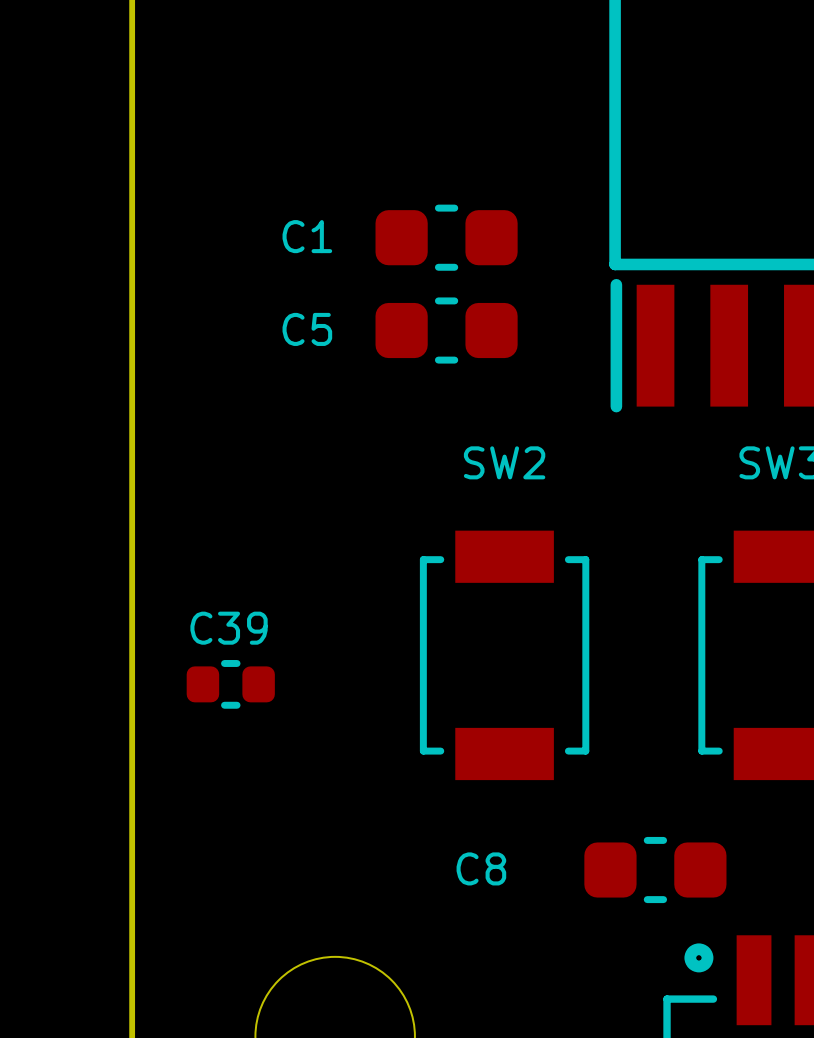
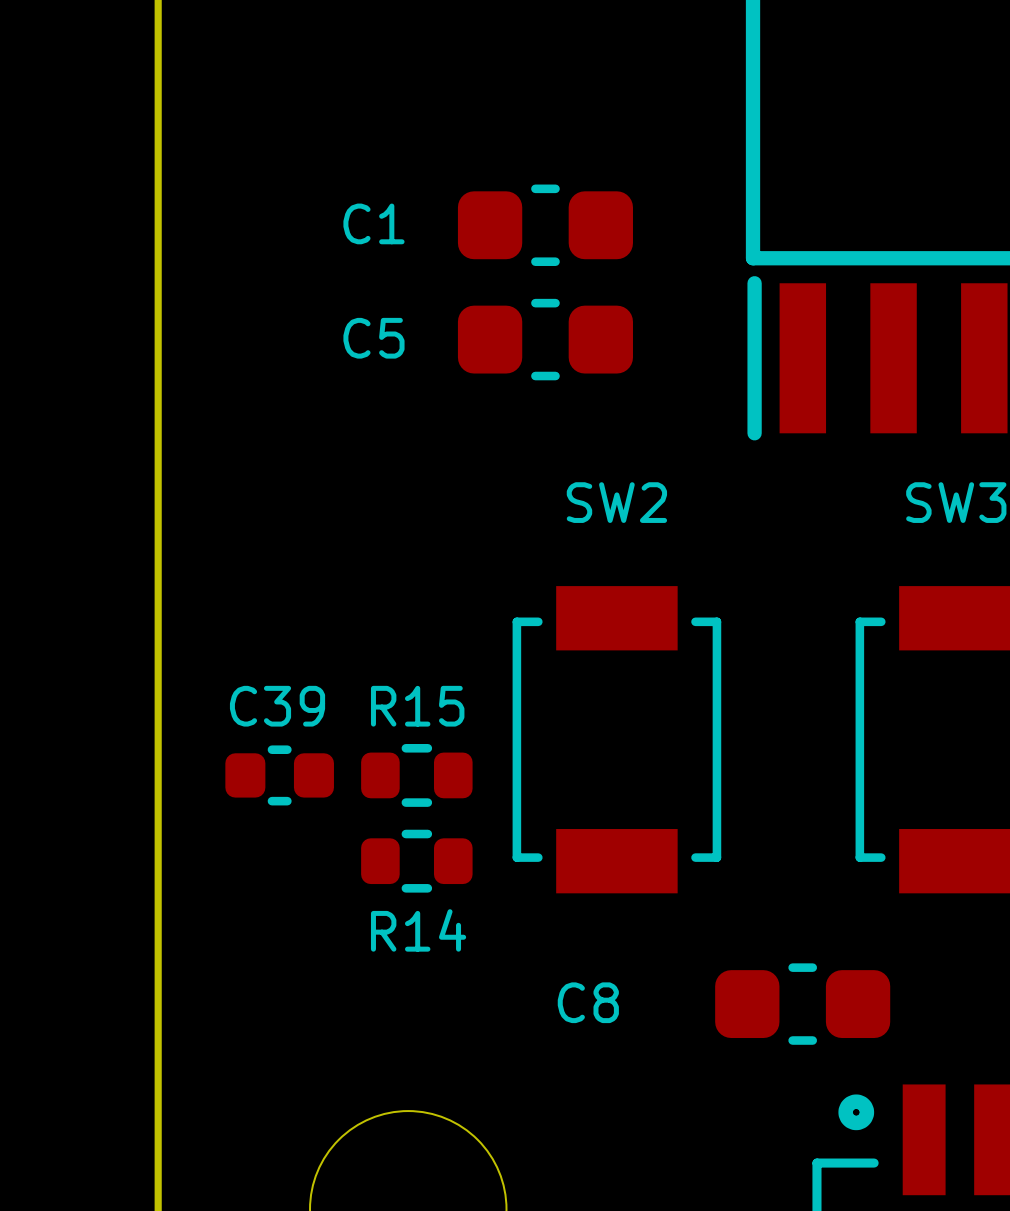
R15: none -> (416, 775)
R14: none -> (416, 861)

